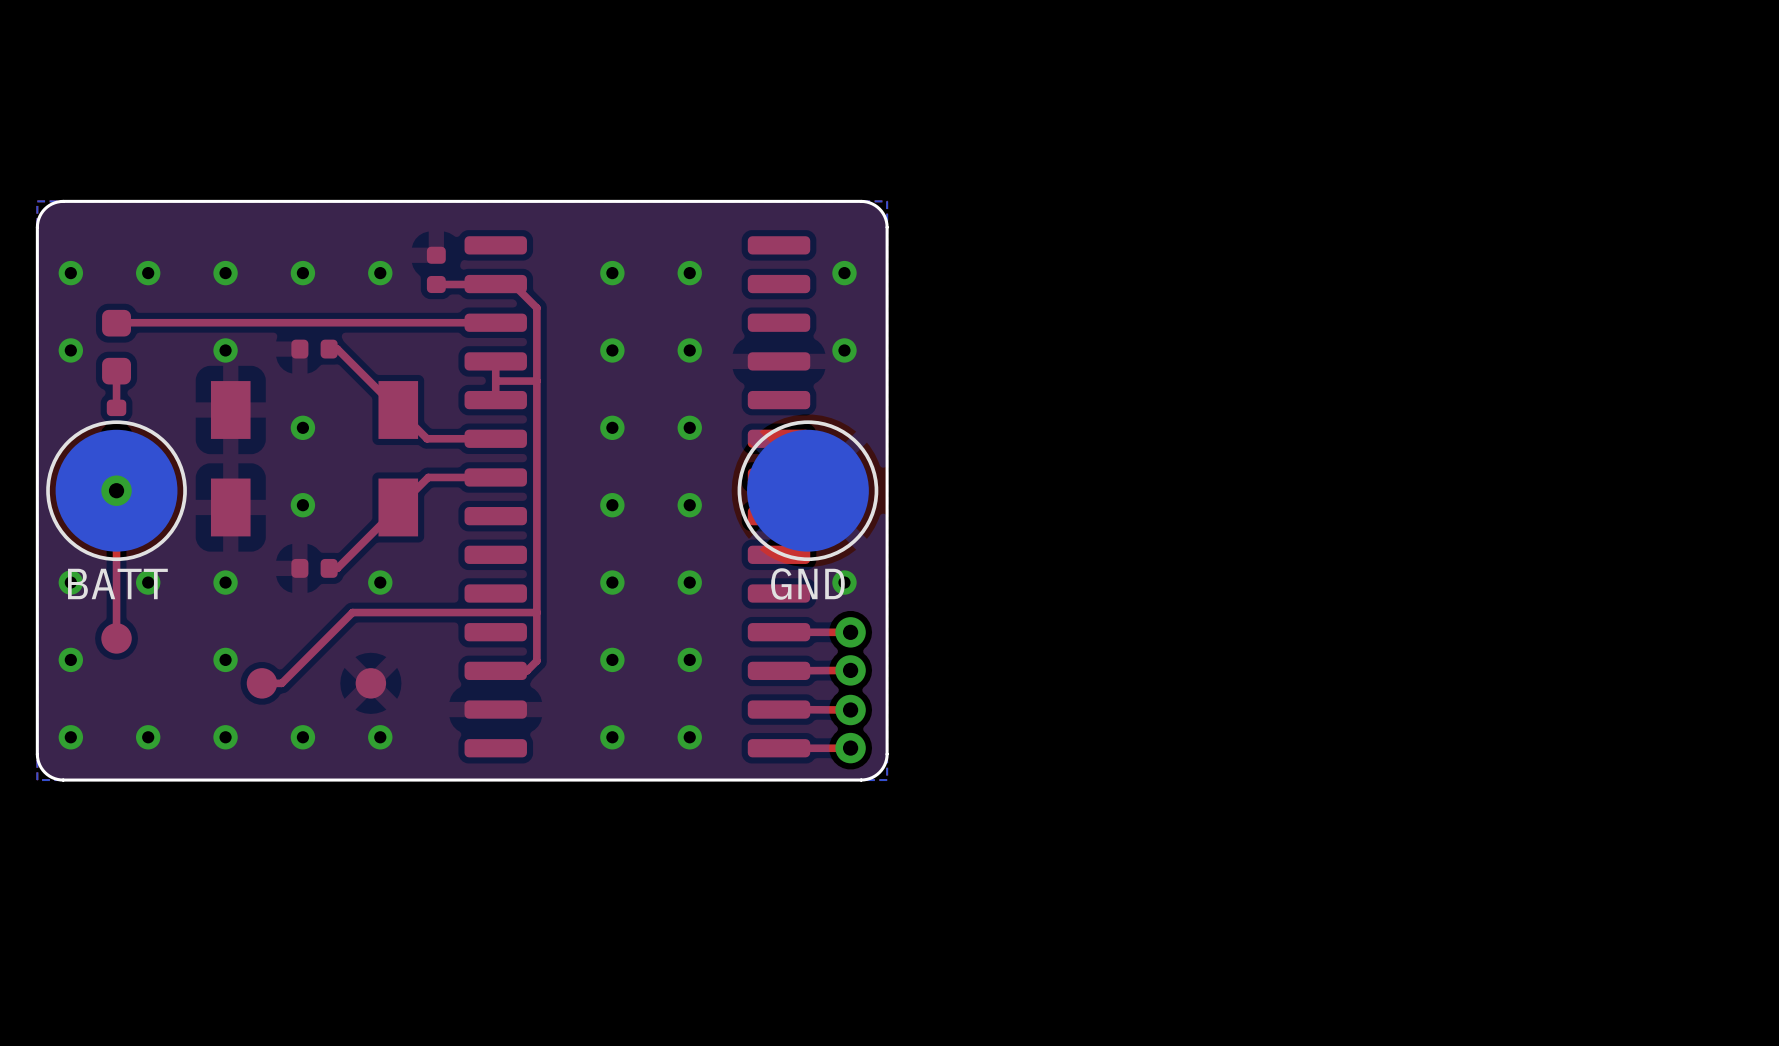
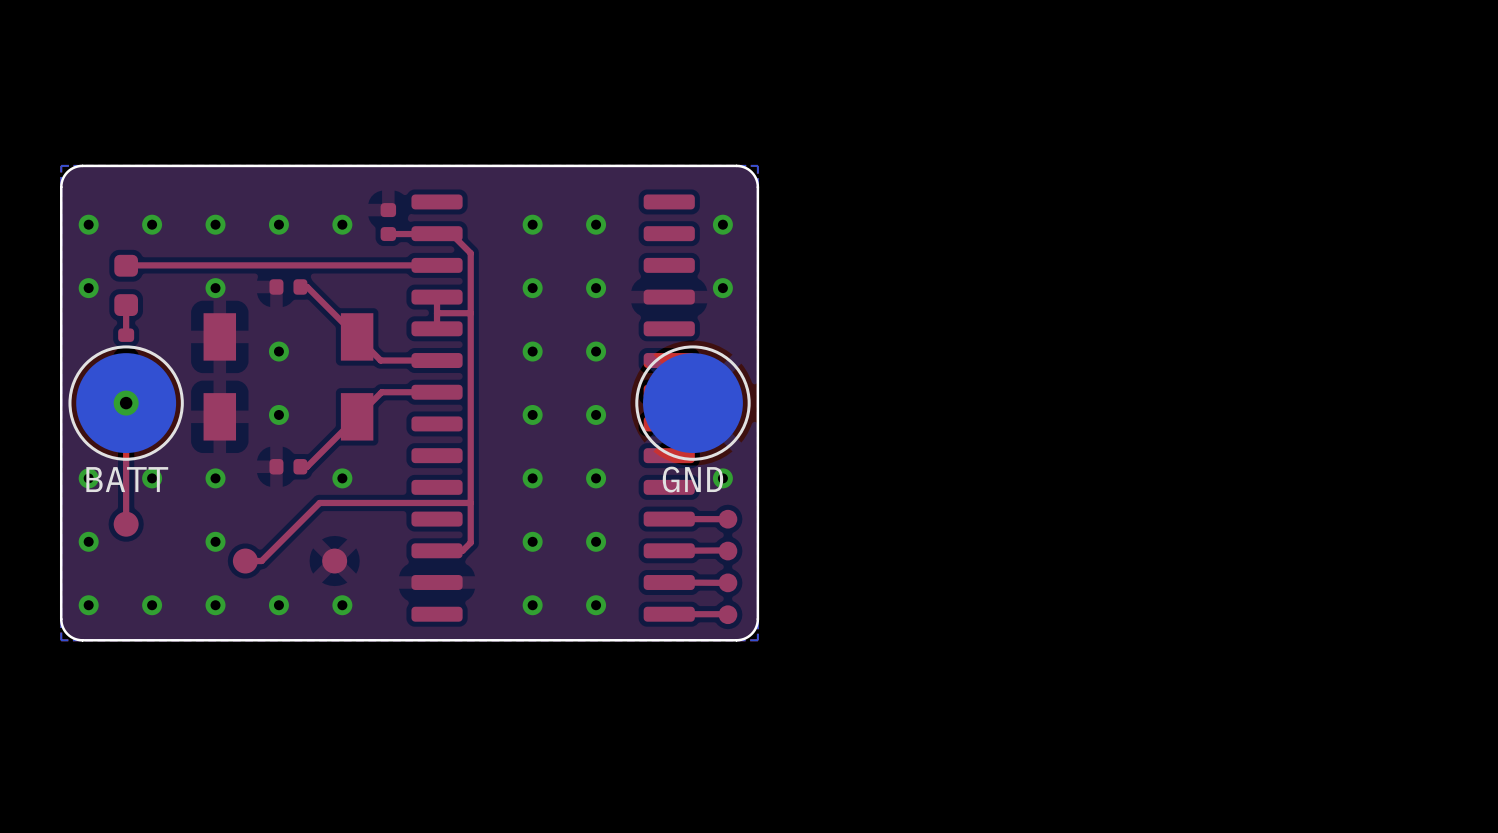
via: (850, 632) -> none
part: none -> (727, 519)
via: (850, 670) -> none
part: none -> (727, 551)
via: (850, 710) -> none
part: none -> (727, 582)
via: (850, 748) -> none
part: none -> (727, 614)

